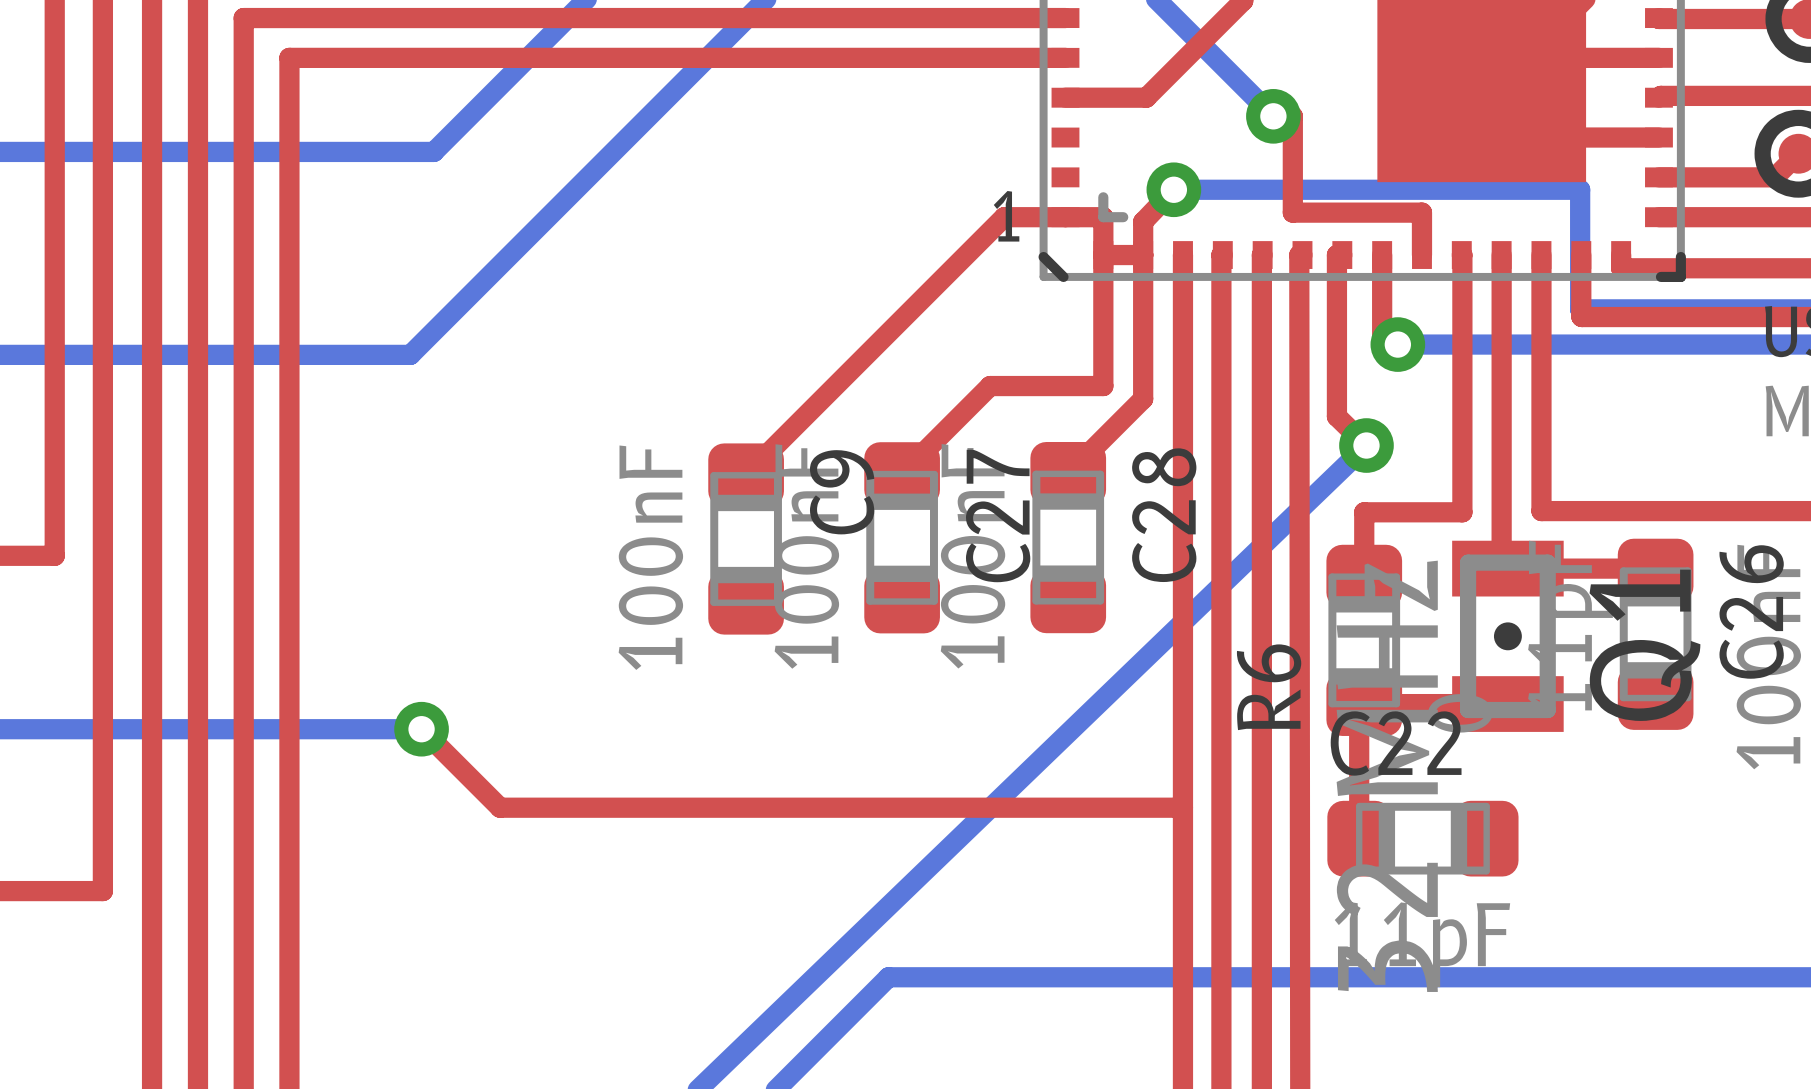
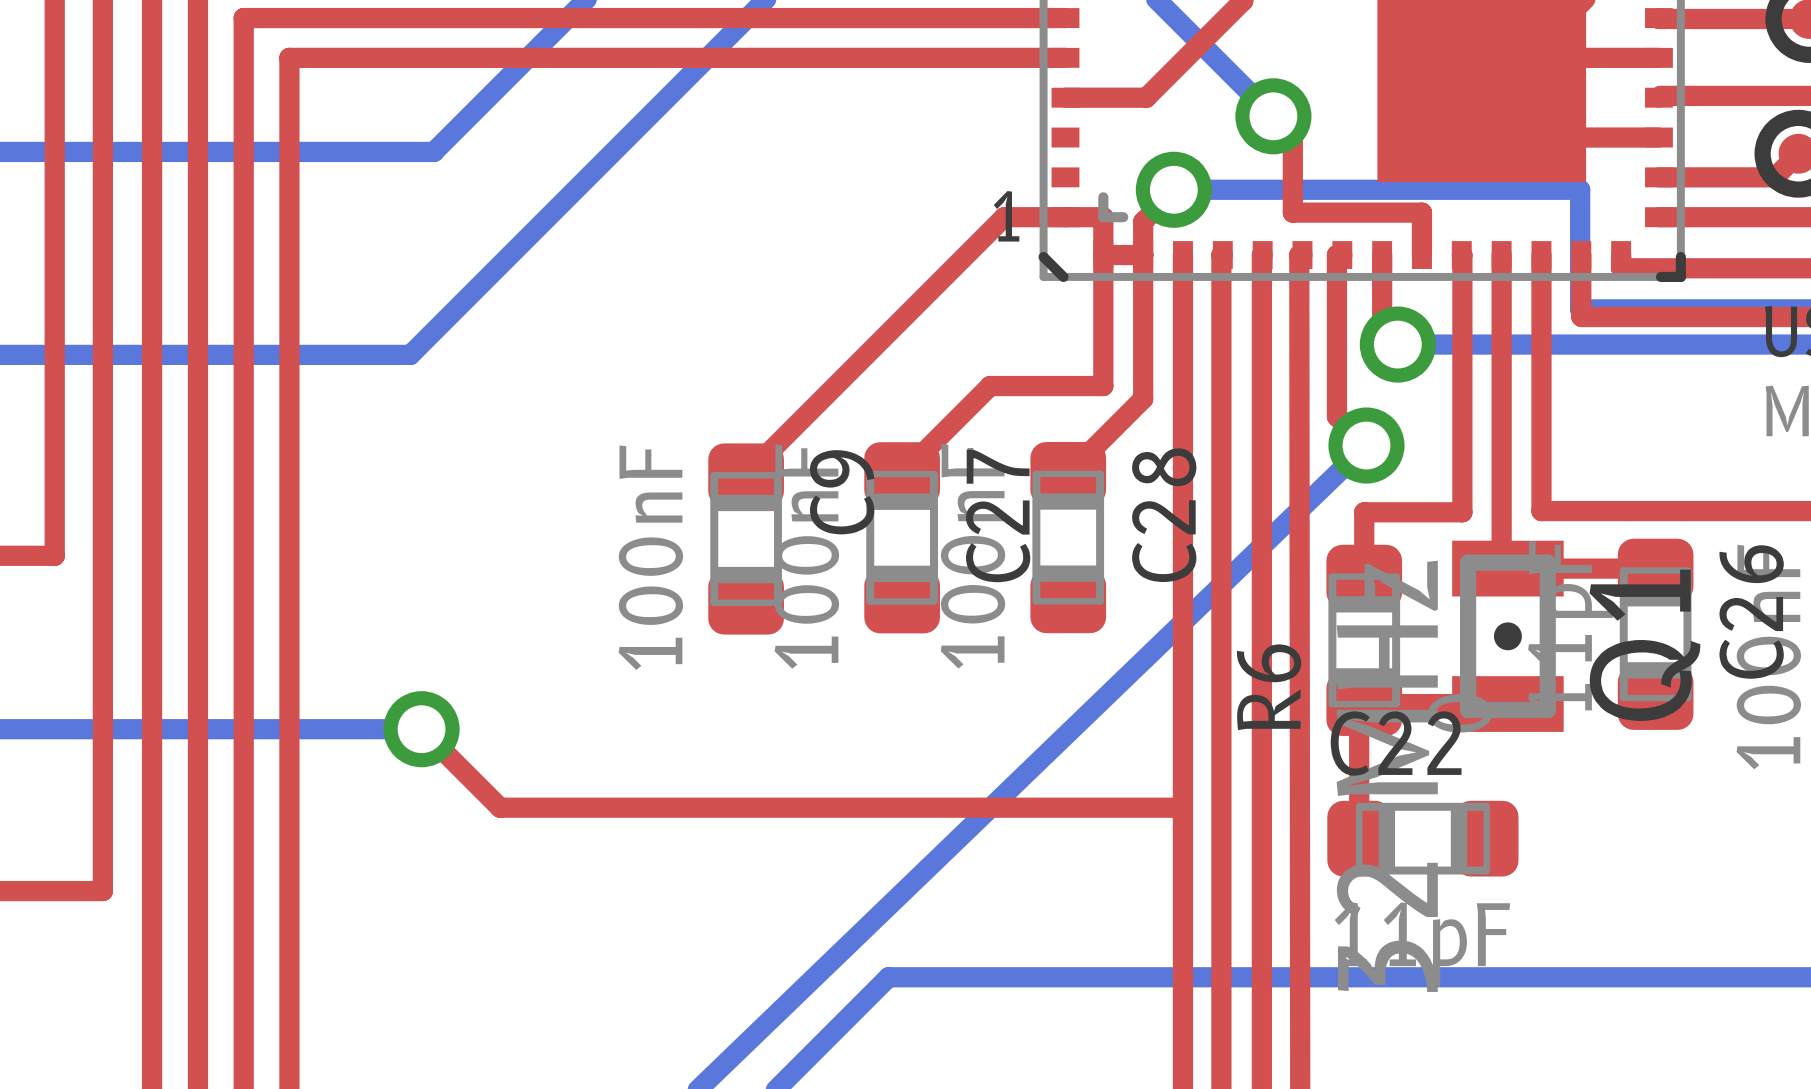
via size: [1246, 89, 1301, 144] -> [1235, 78, 1312, 155]
via size: [1146, 162, 1202, 218] -> [1135, 151, 1212, 228]
via size: [1370, 317, 1426, 372] -> [1359, 306, 1436, 383]
via size: [1339, 418, 1394, 473] -> [1328, 407, 1405, 484]
via size: [394, 701, 449, 757] -> [383, 691, 460, 768]

